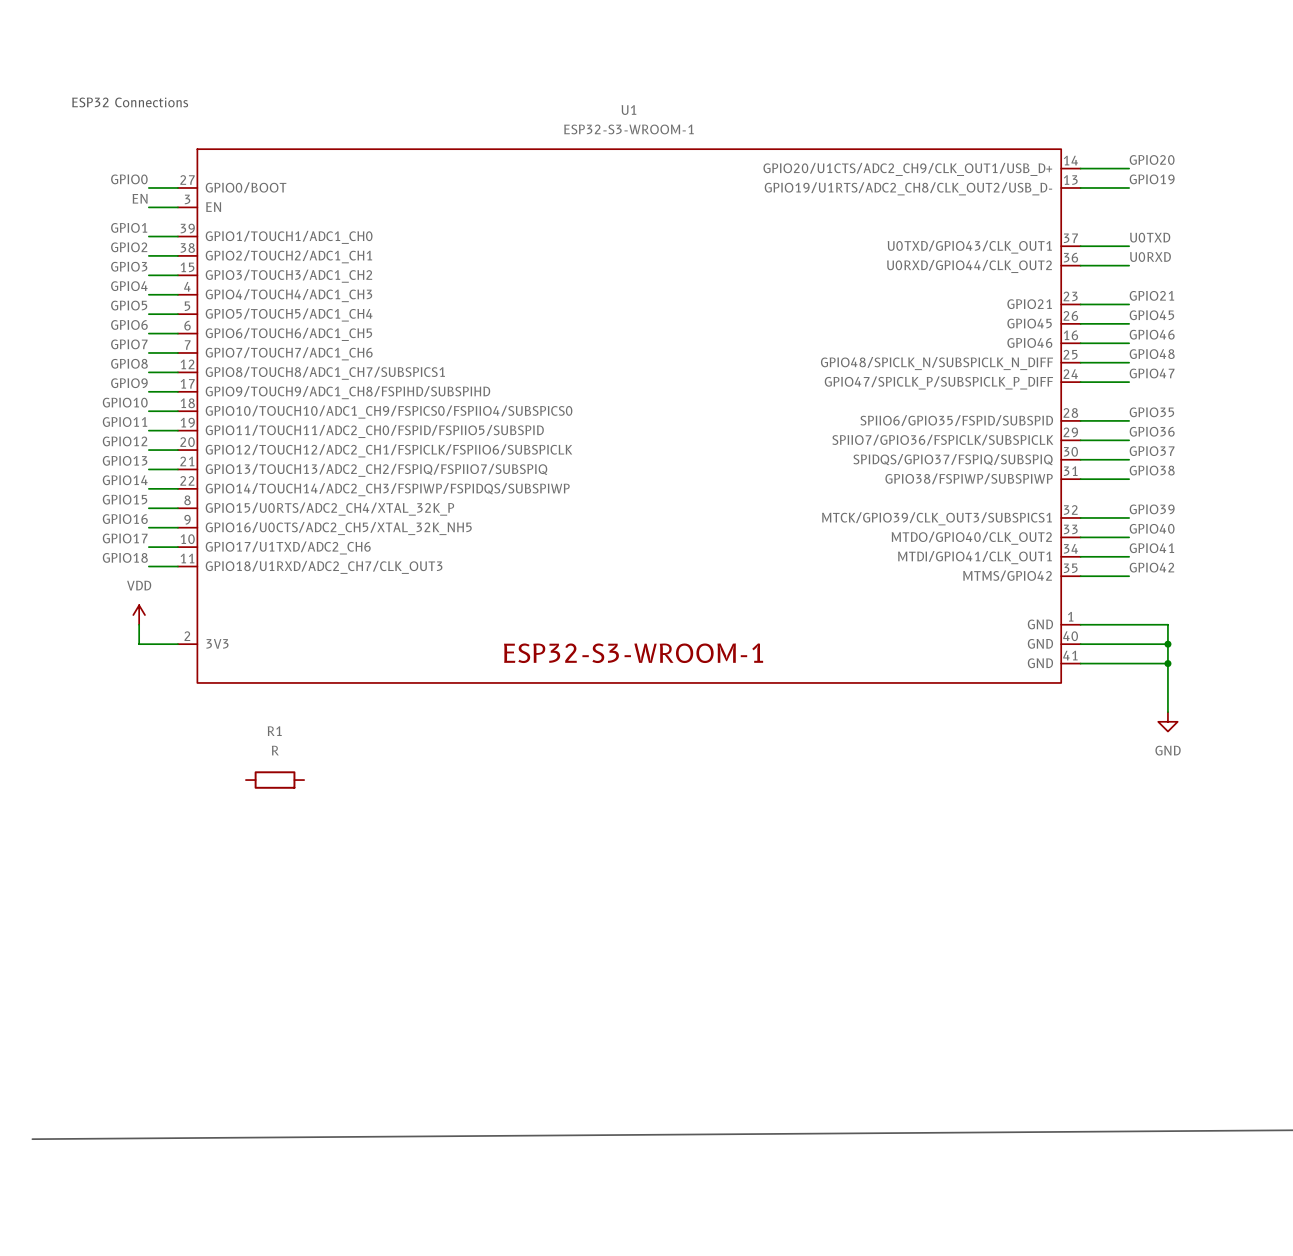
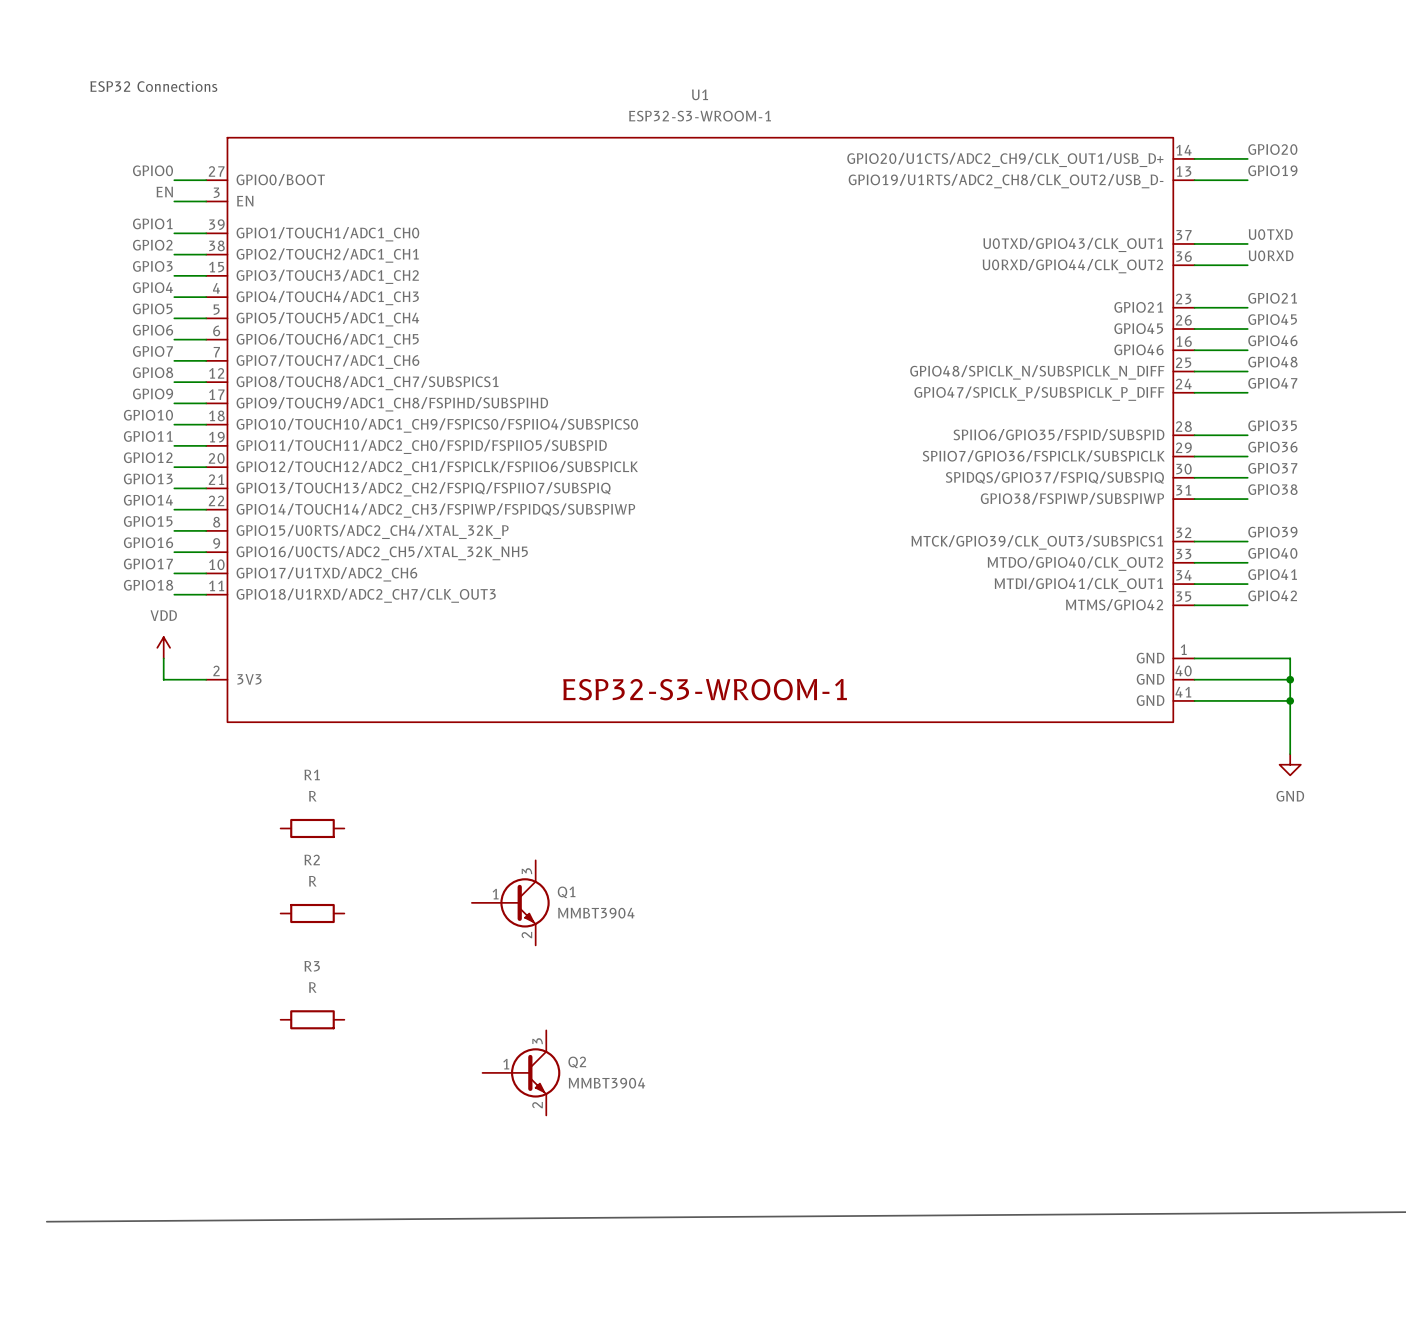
Q1: none -> MMBT3904 (510, 902)
R2: none -> R (312, 913)
R3: none -> R (312, 1019)
Q2: none -> MMBT3904 (521, 1072)

